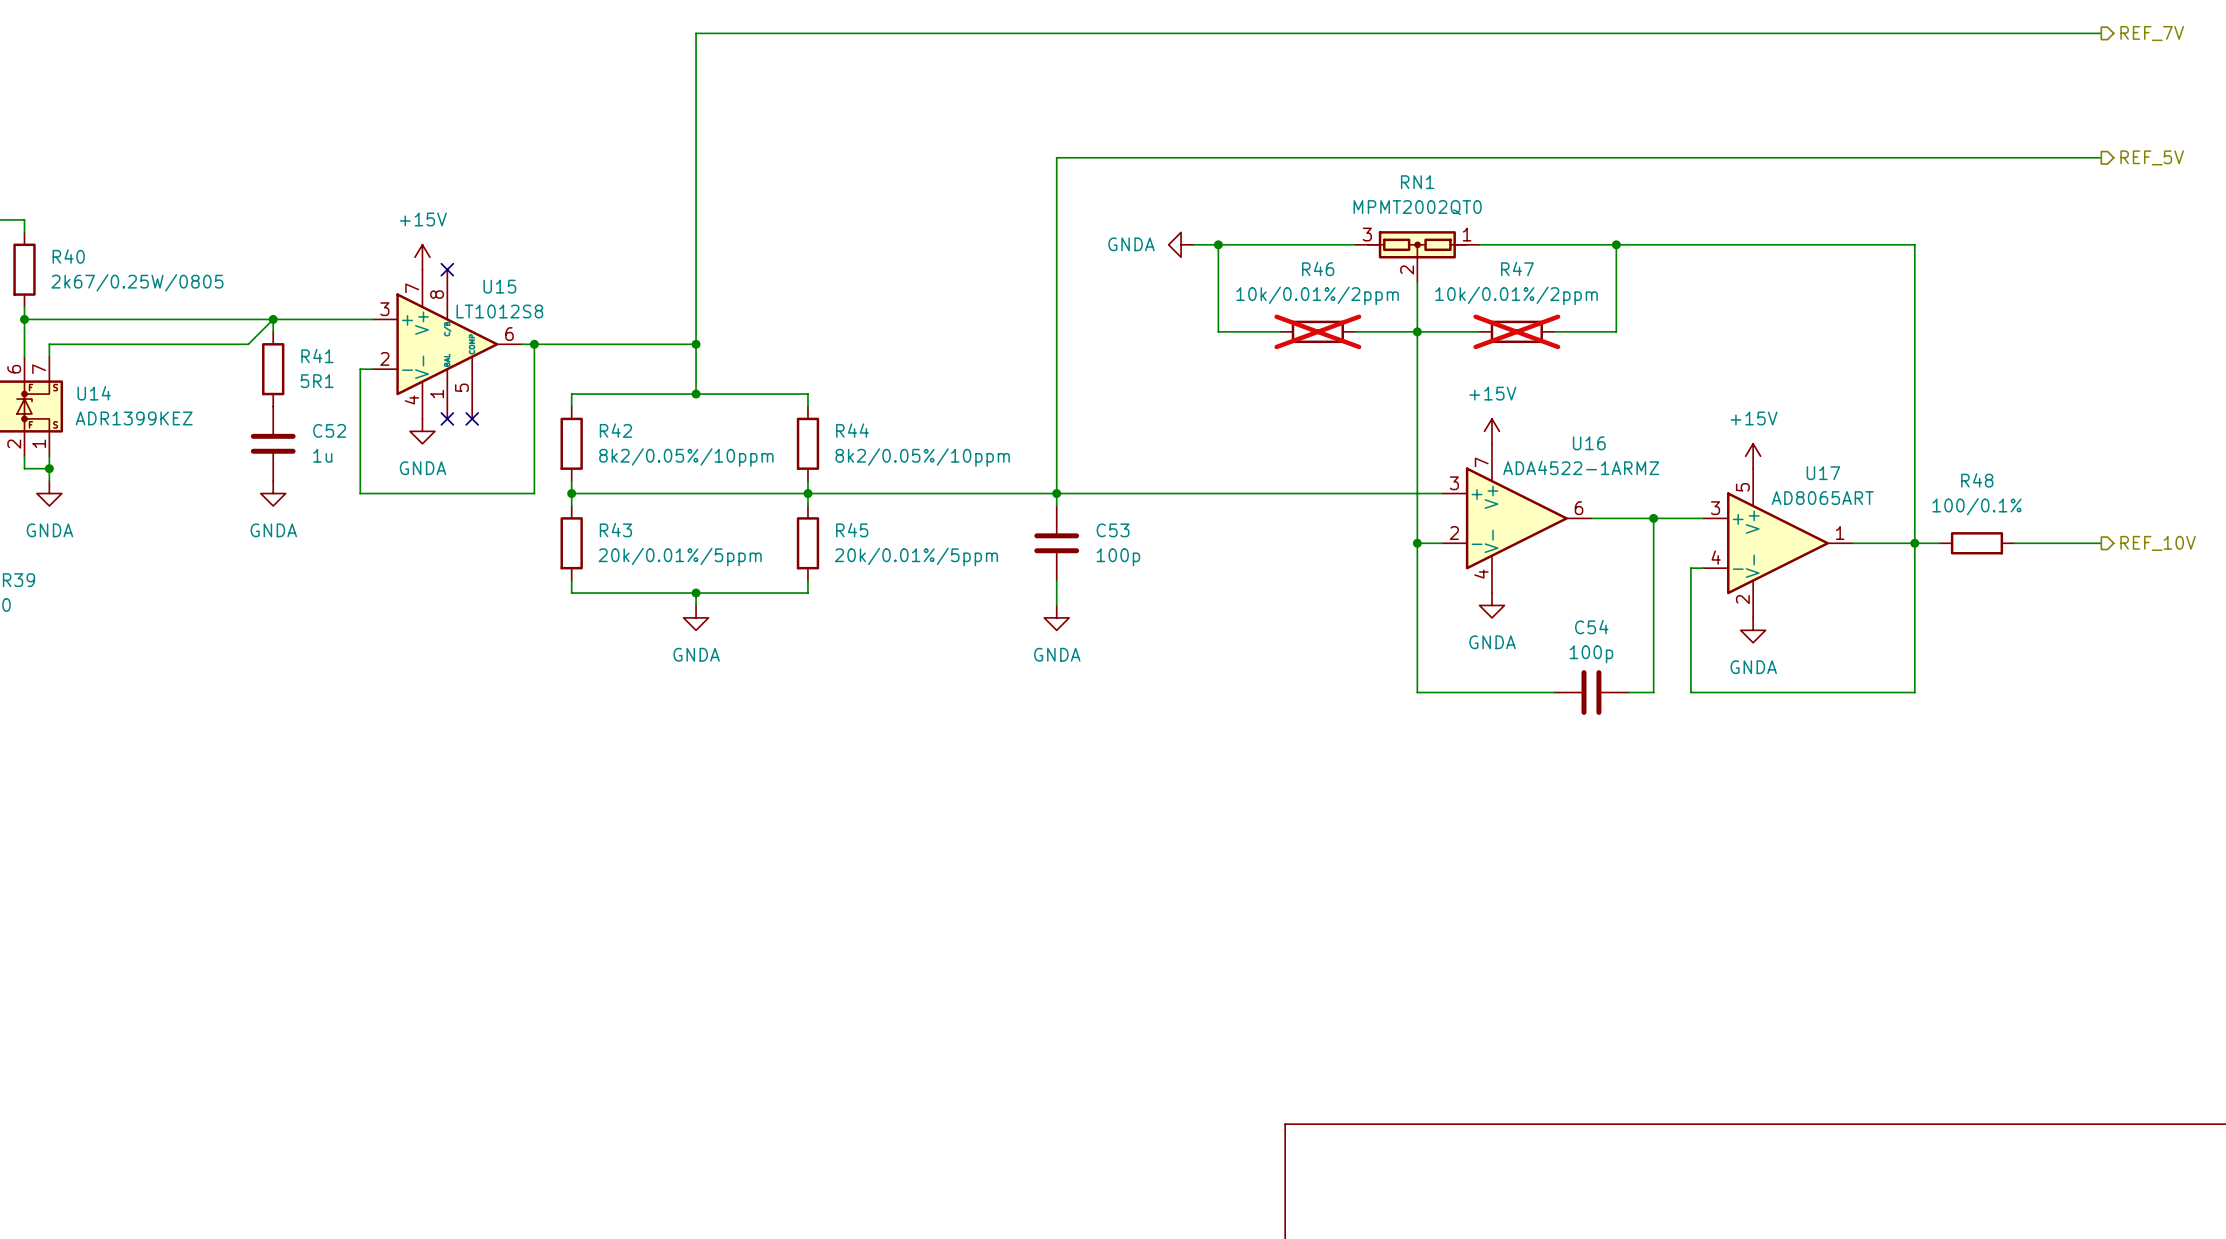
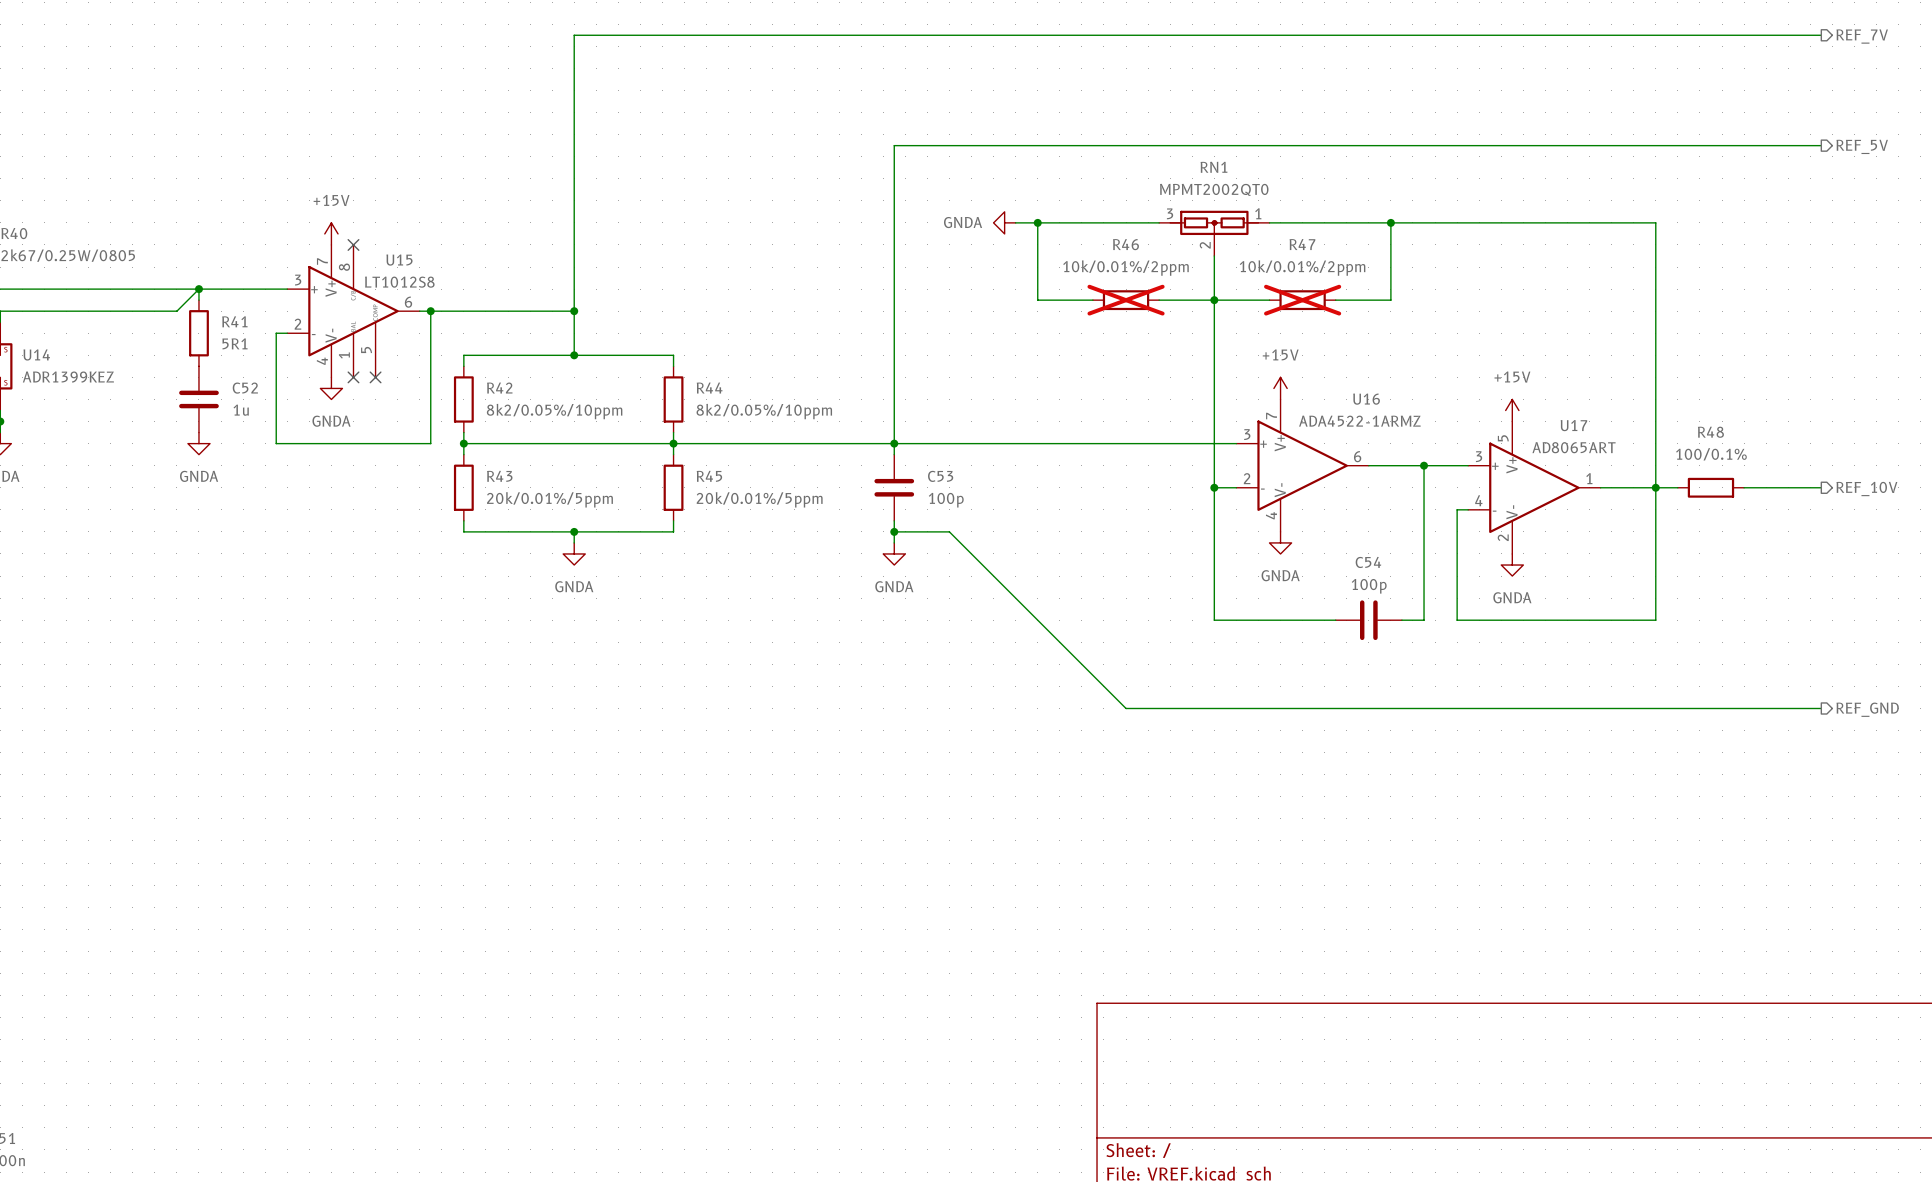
wire: none -> (894, 531) (949, 531) (1126, 708) (1821, 708)
junction: none -> (894, 531)
hierarchical label: none -> REF_GND (1867, 709)

